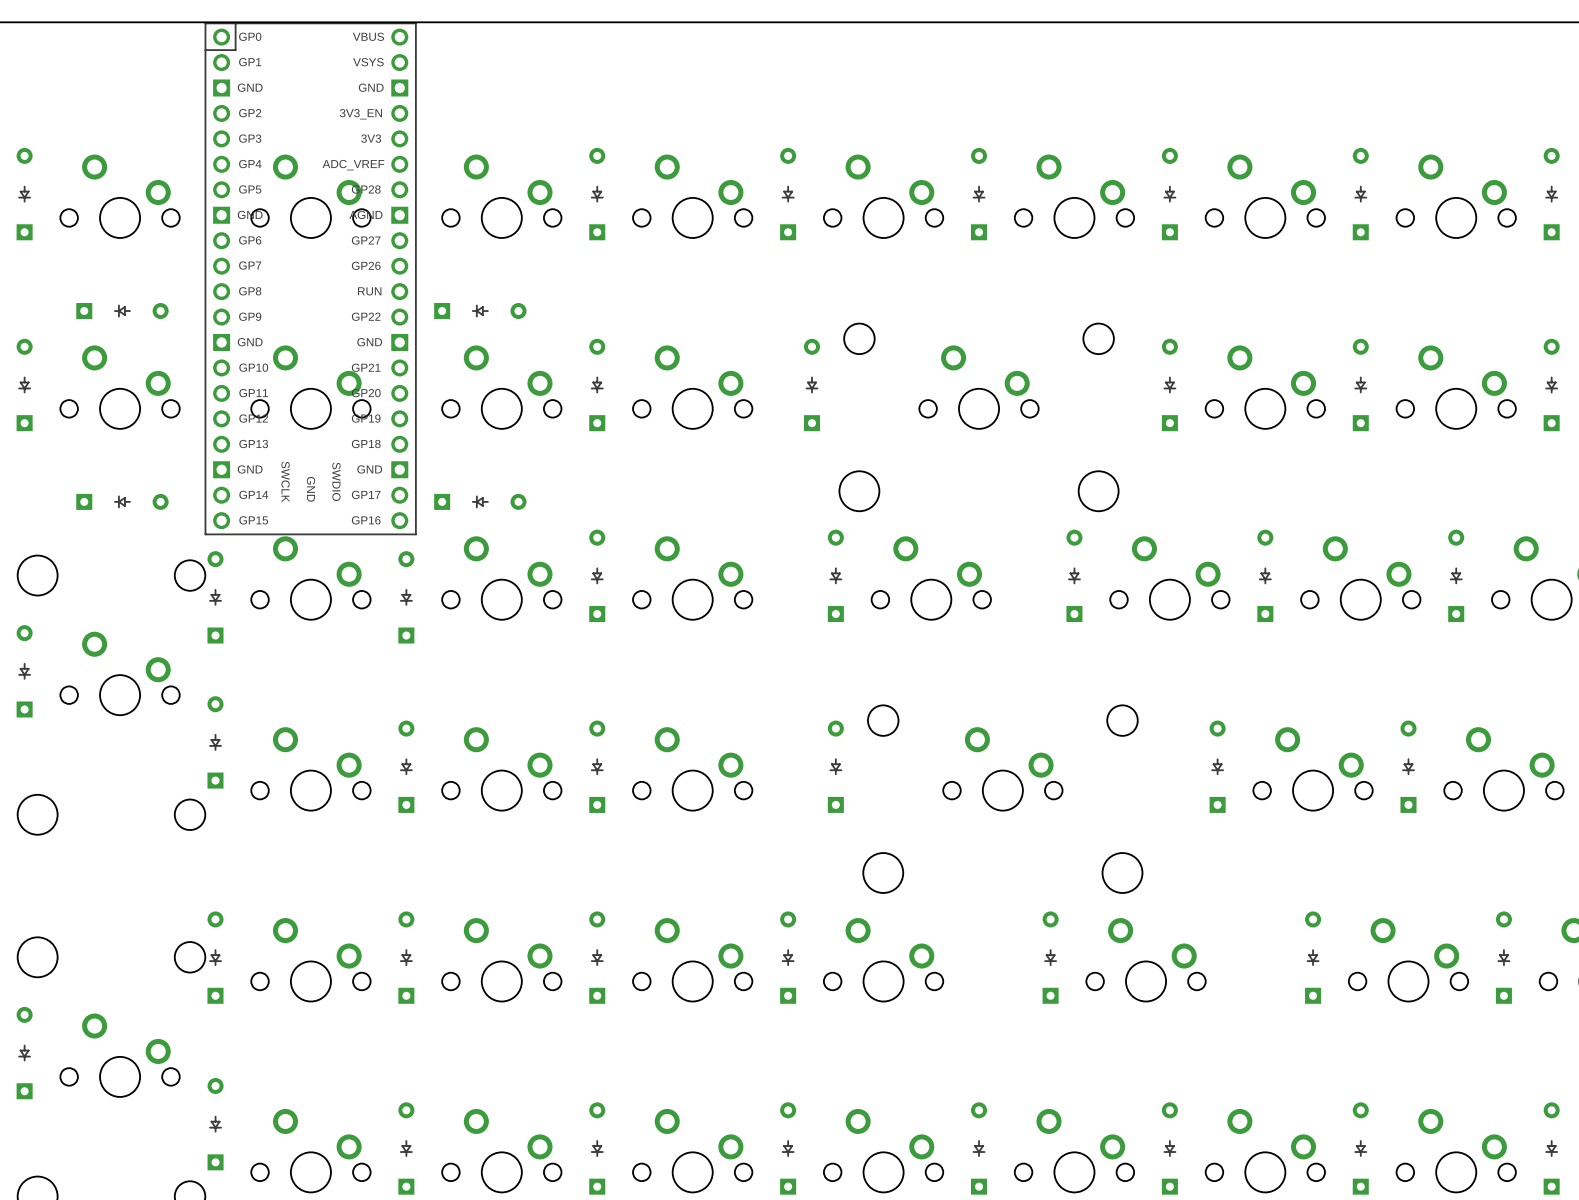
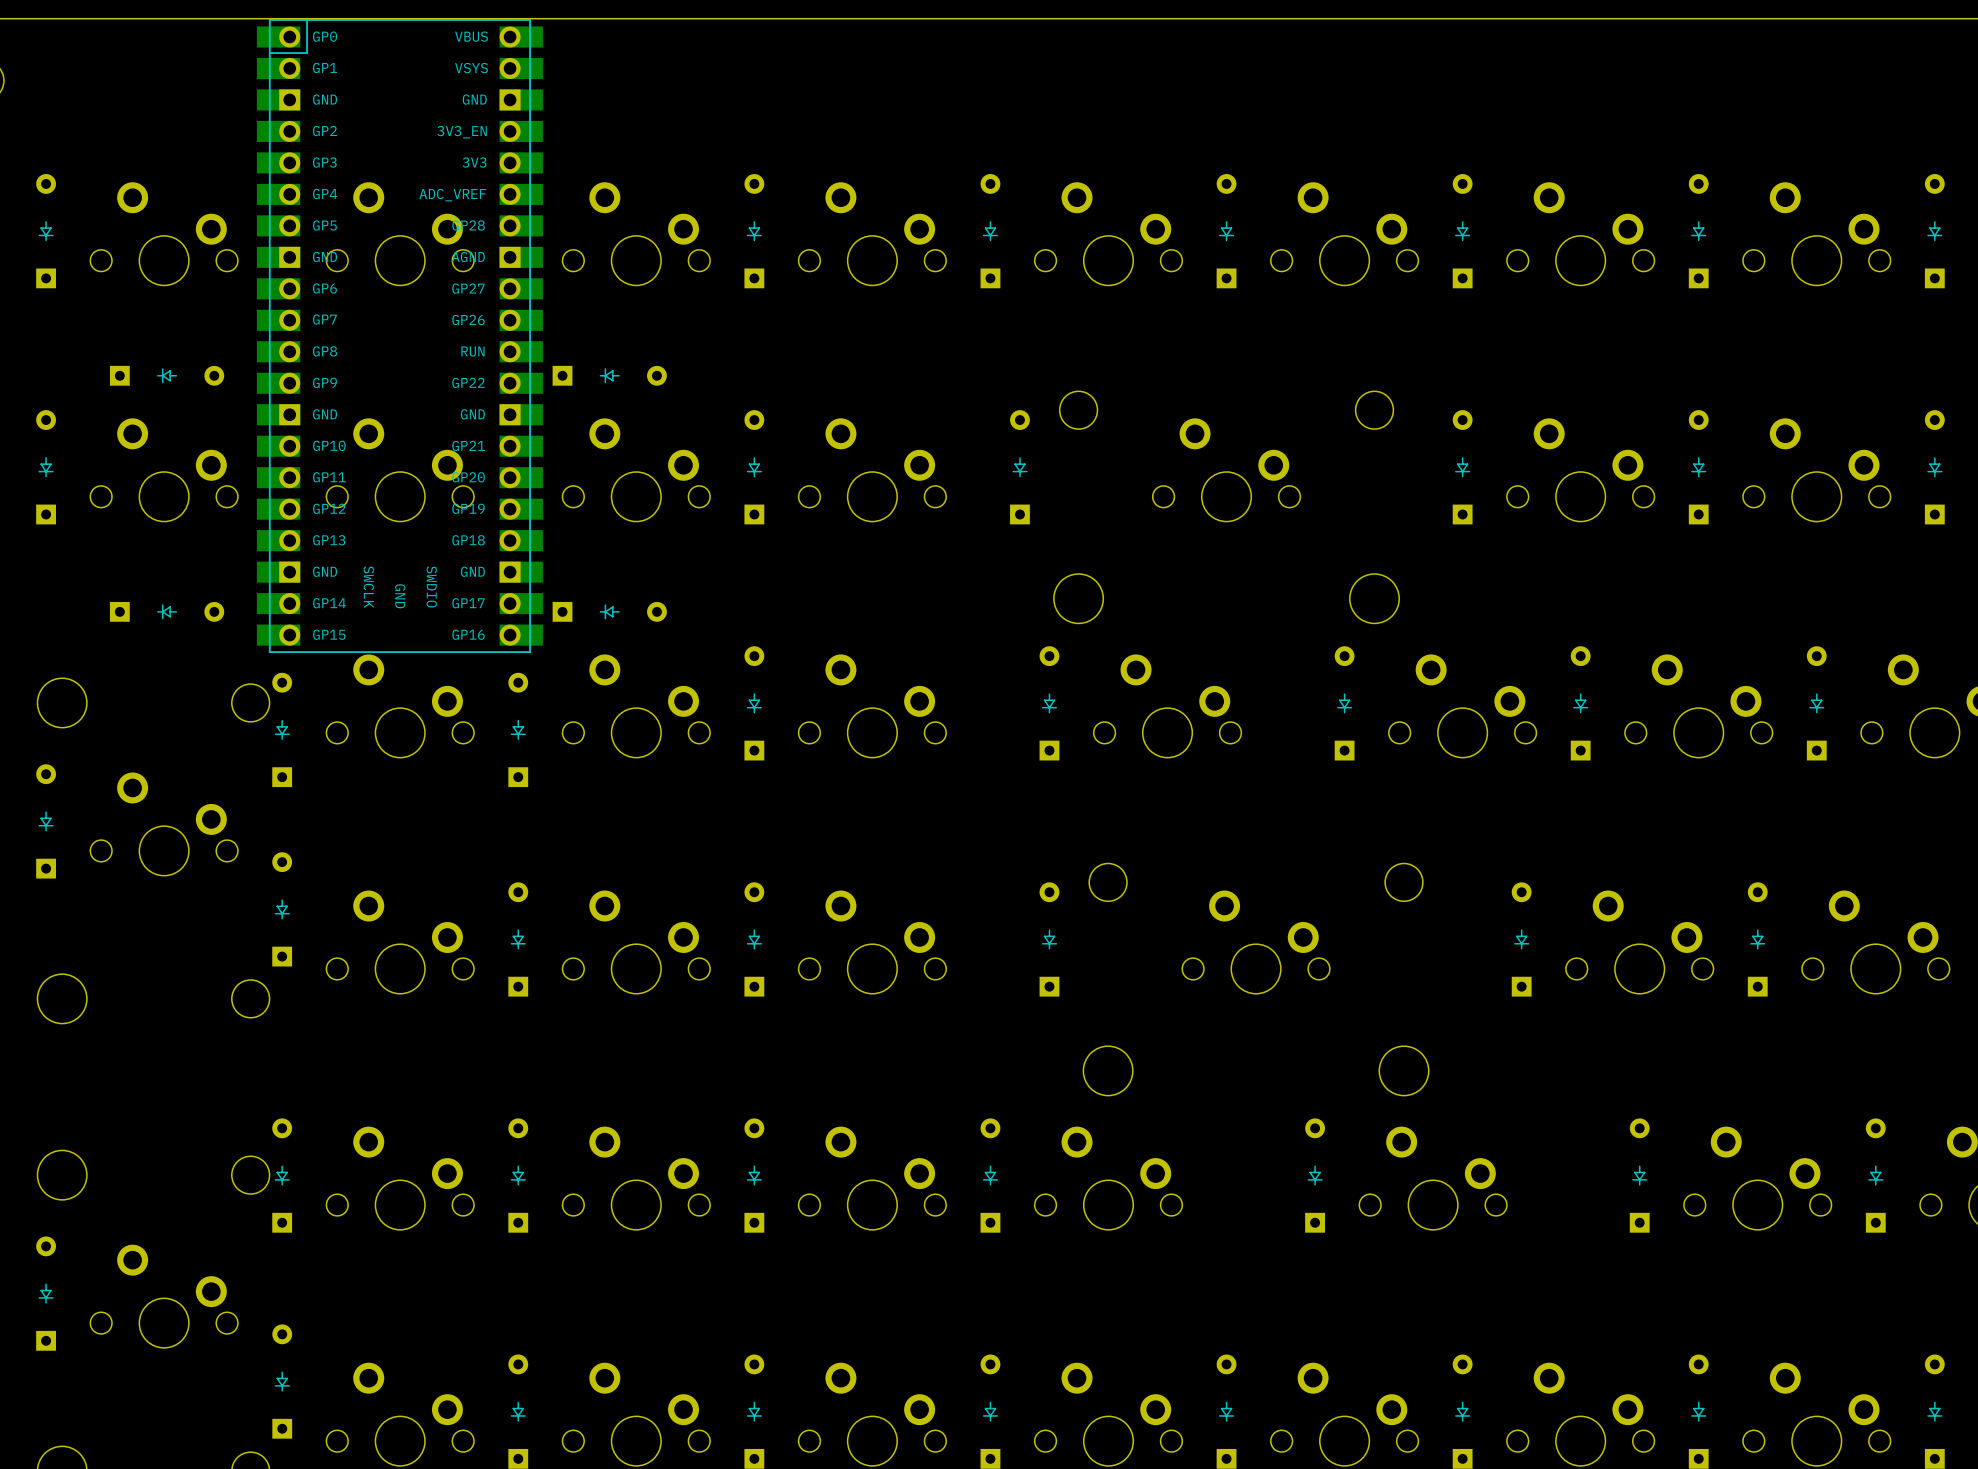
part footprint: [204, 22, 417, 536] -> [256, 19, 543, 653]

